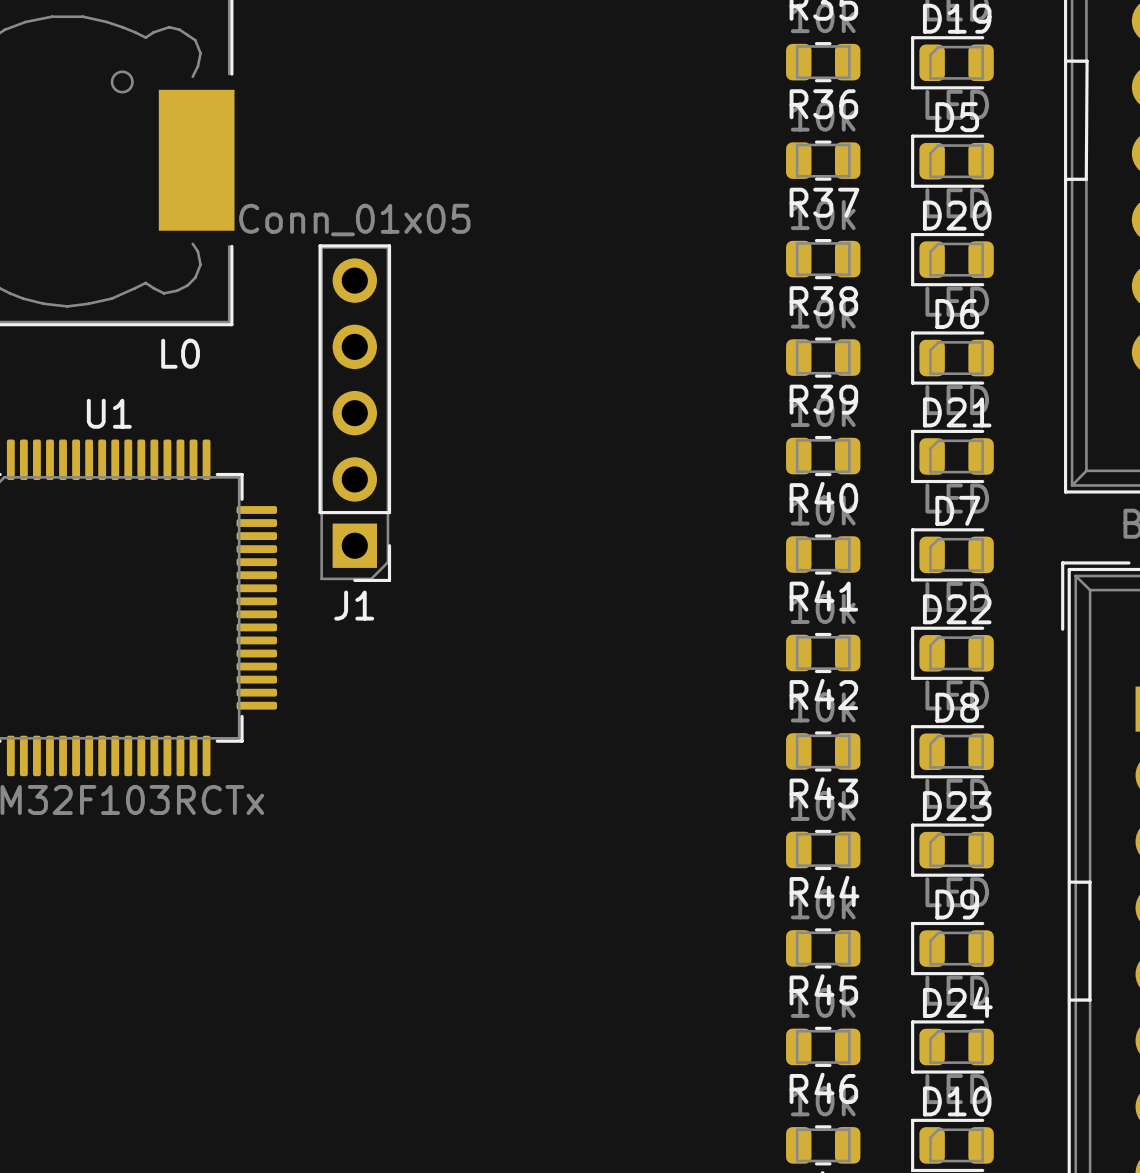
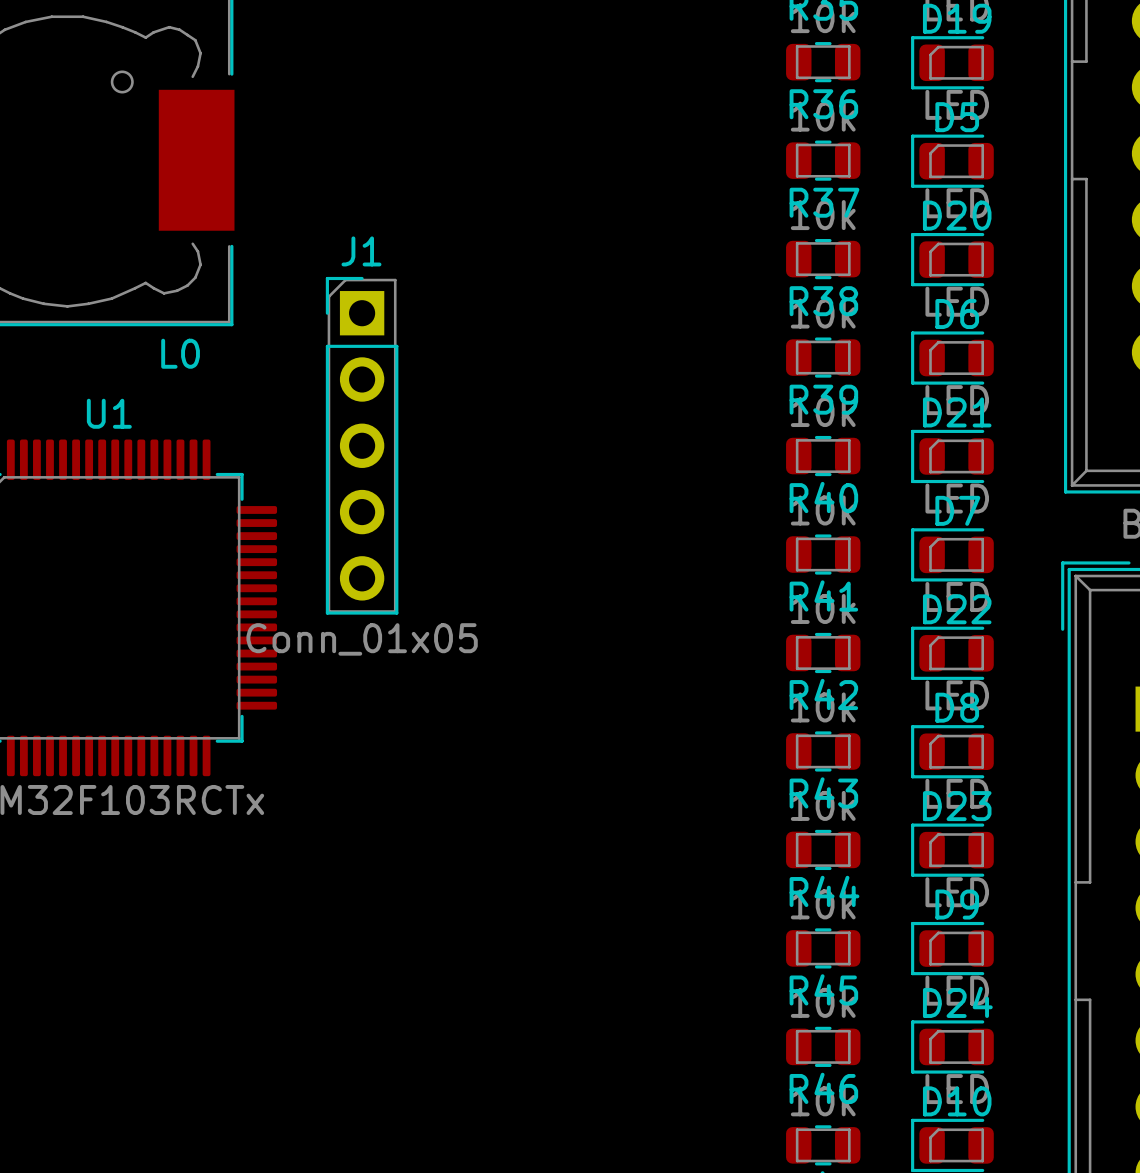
line: (1066, 61) (1087, 61) (1086, 179) (1065, 179) -> none
J1 rotation: 0° (354, 413) -> 180° (362, 445)
line: (1069, 882) (1089, 882) (1089, 1000) (1069, 1000) -> none

